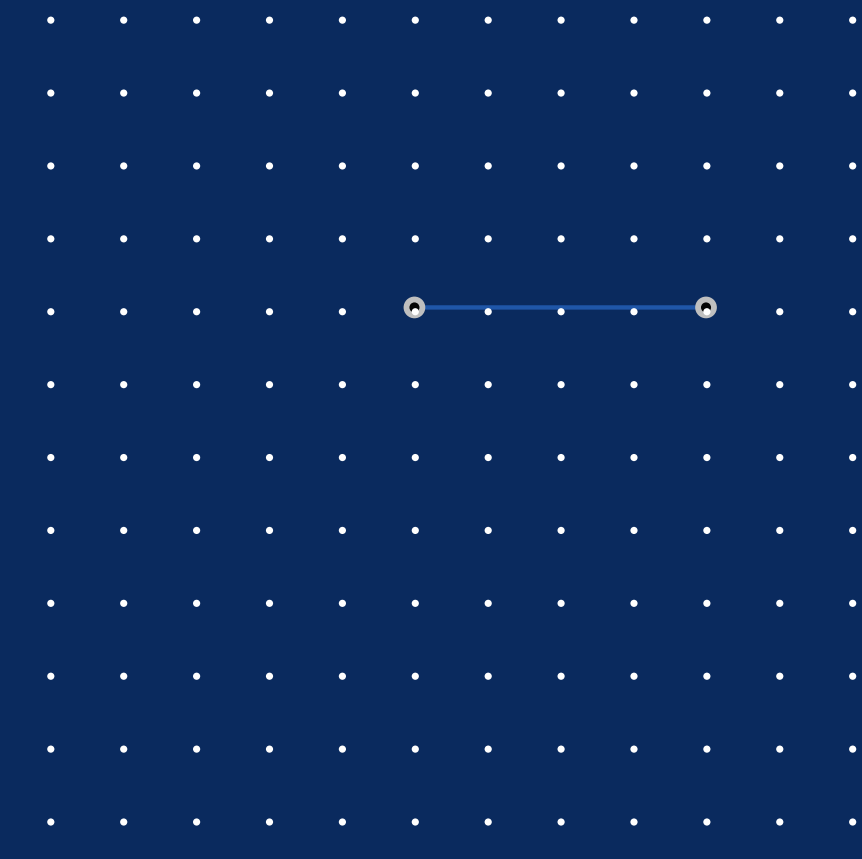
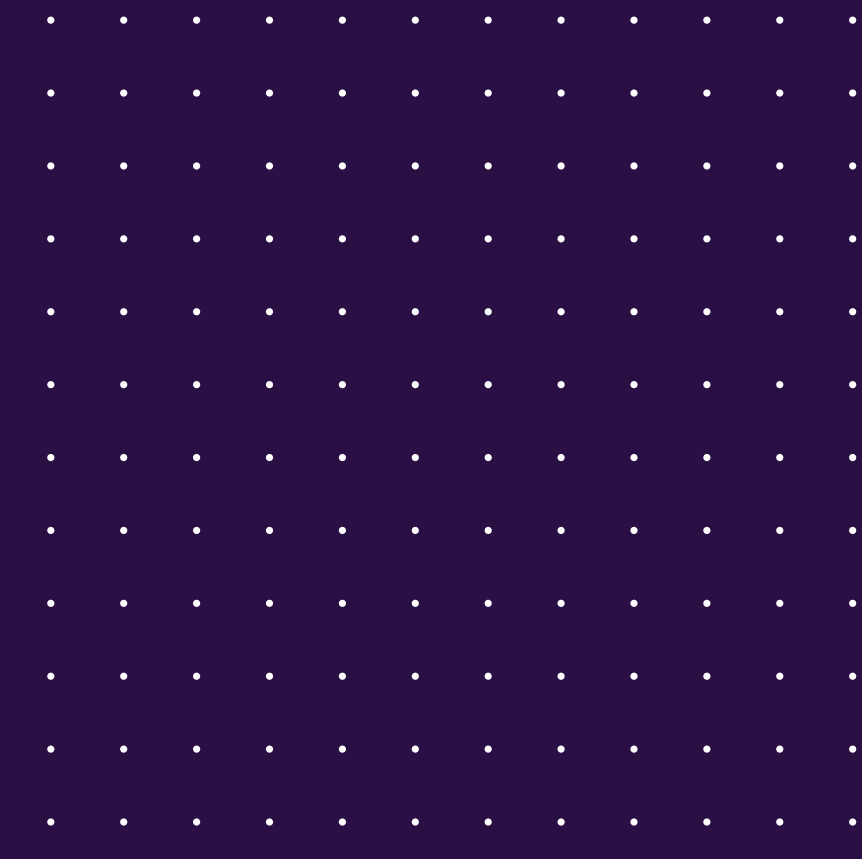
track: (414, 307) (706, 307) -> none
via: (414, 307) -> none
via: (706, 307) -> none

